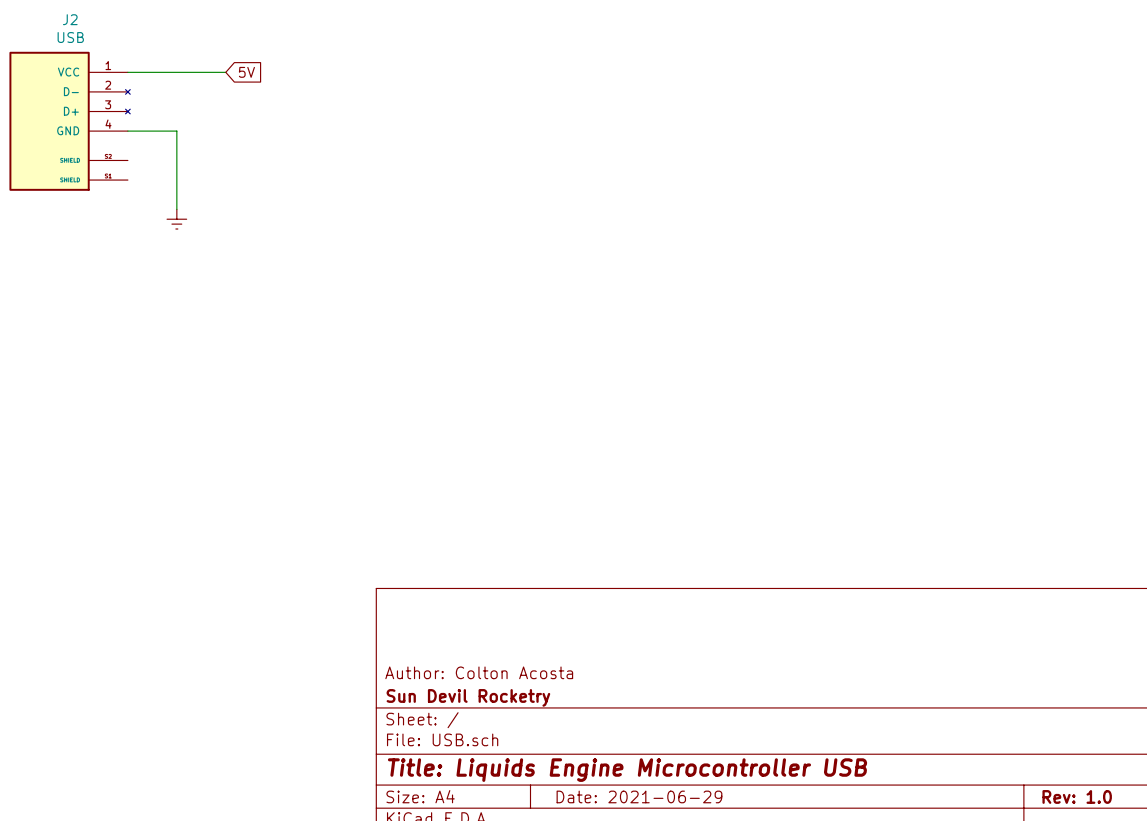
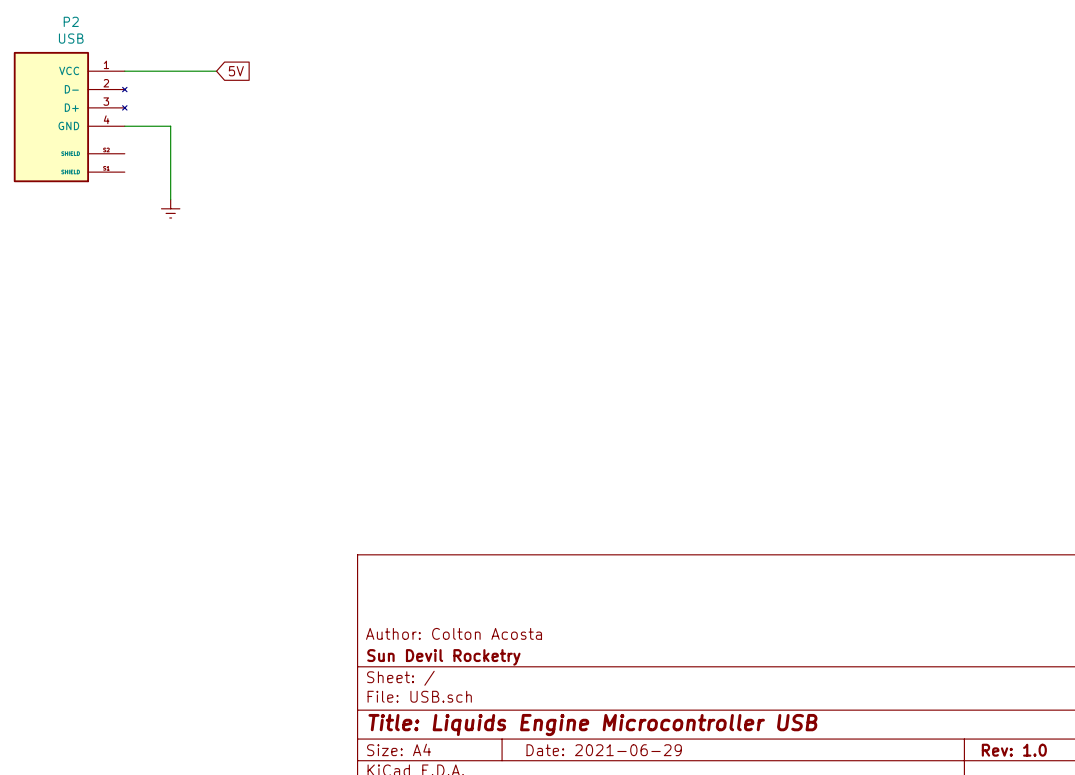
J2 name: J2 (70, 19) -> P2 (71, 21)

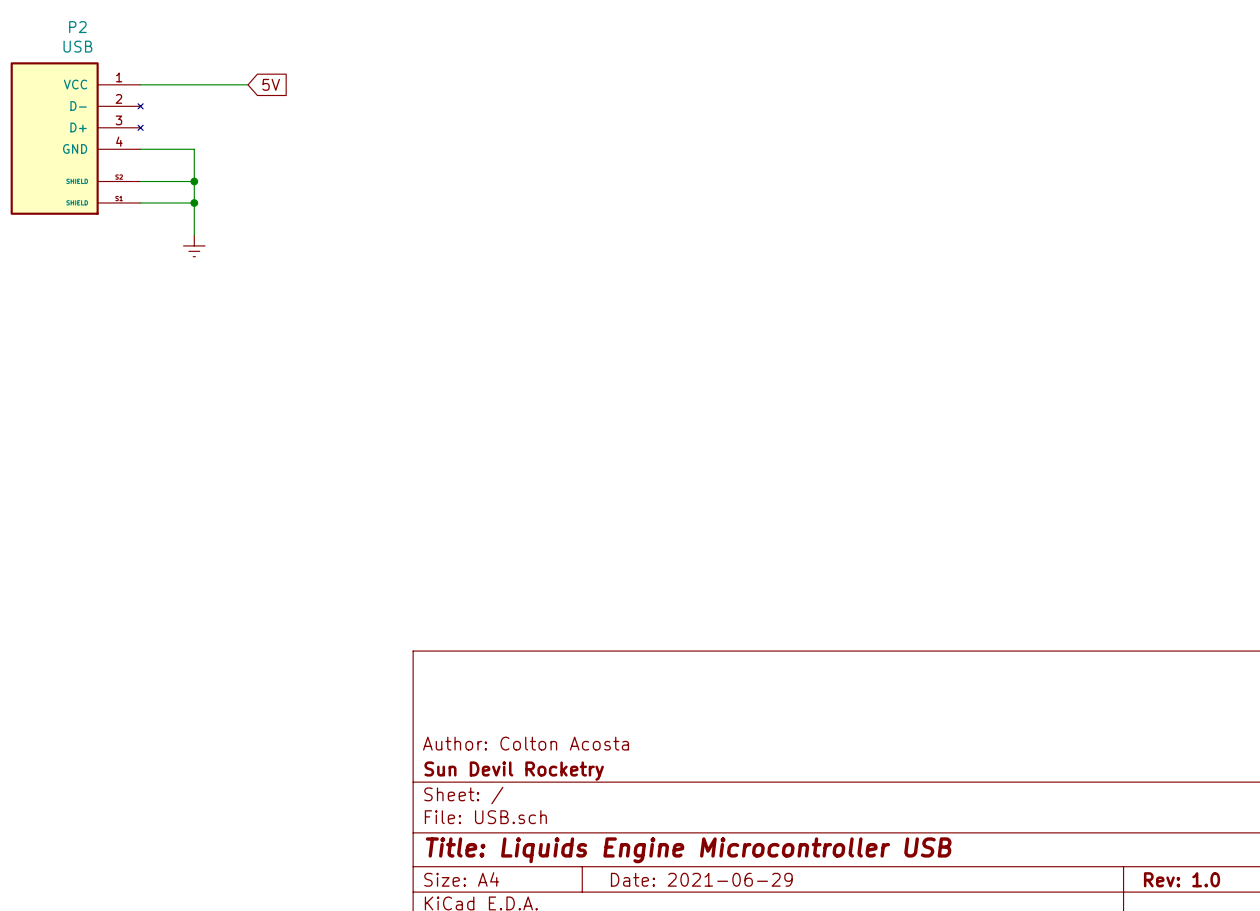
wire: none -> (140, 181) (194, 181)
junction: none -> (194, 181)
wire: none -> (140, 202) (194, 202)
junction: none -> (194, 202)

